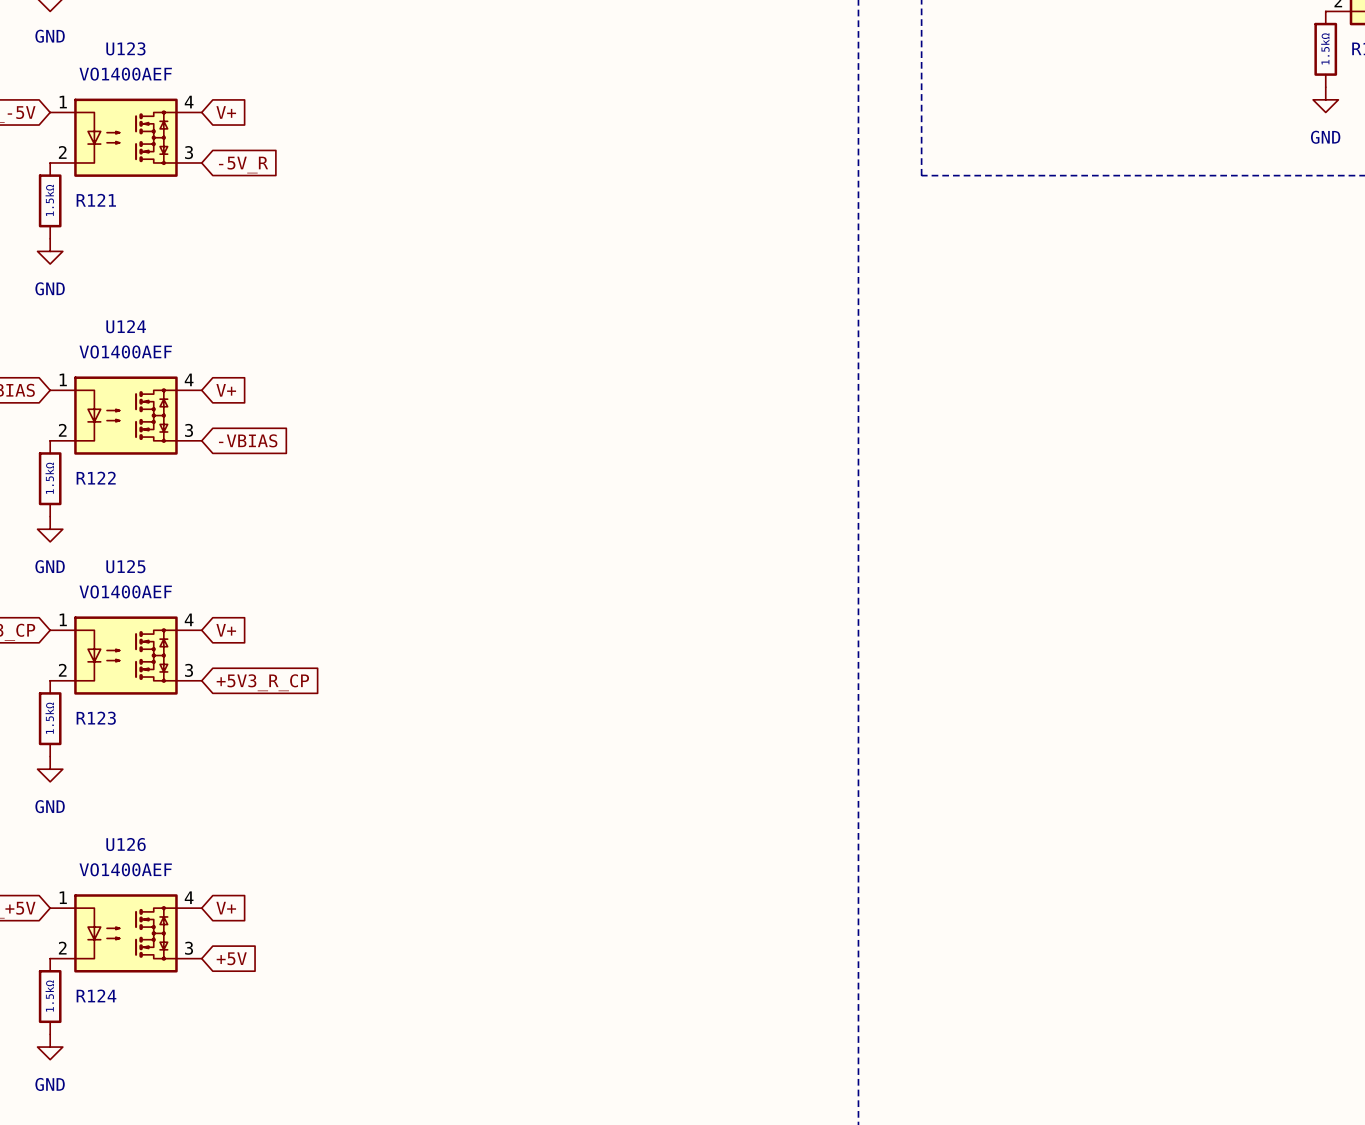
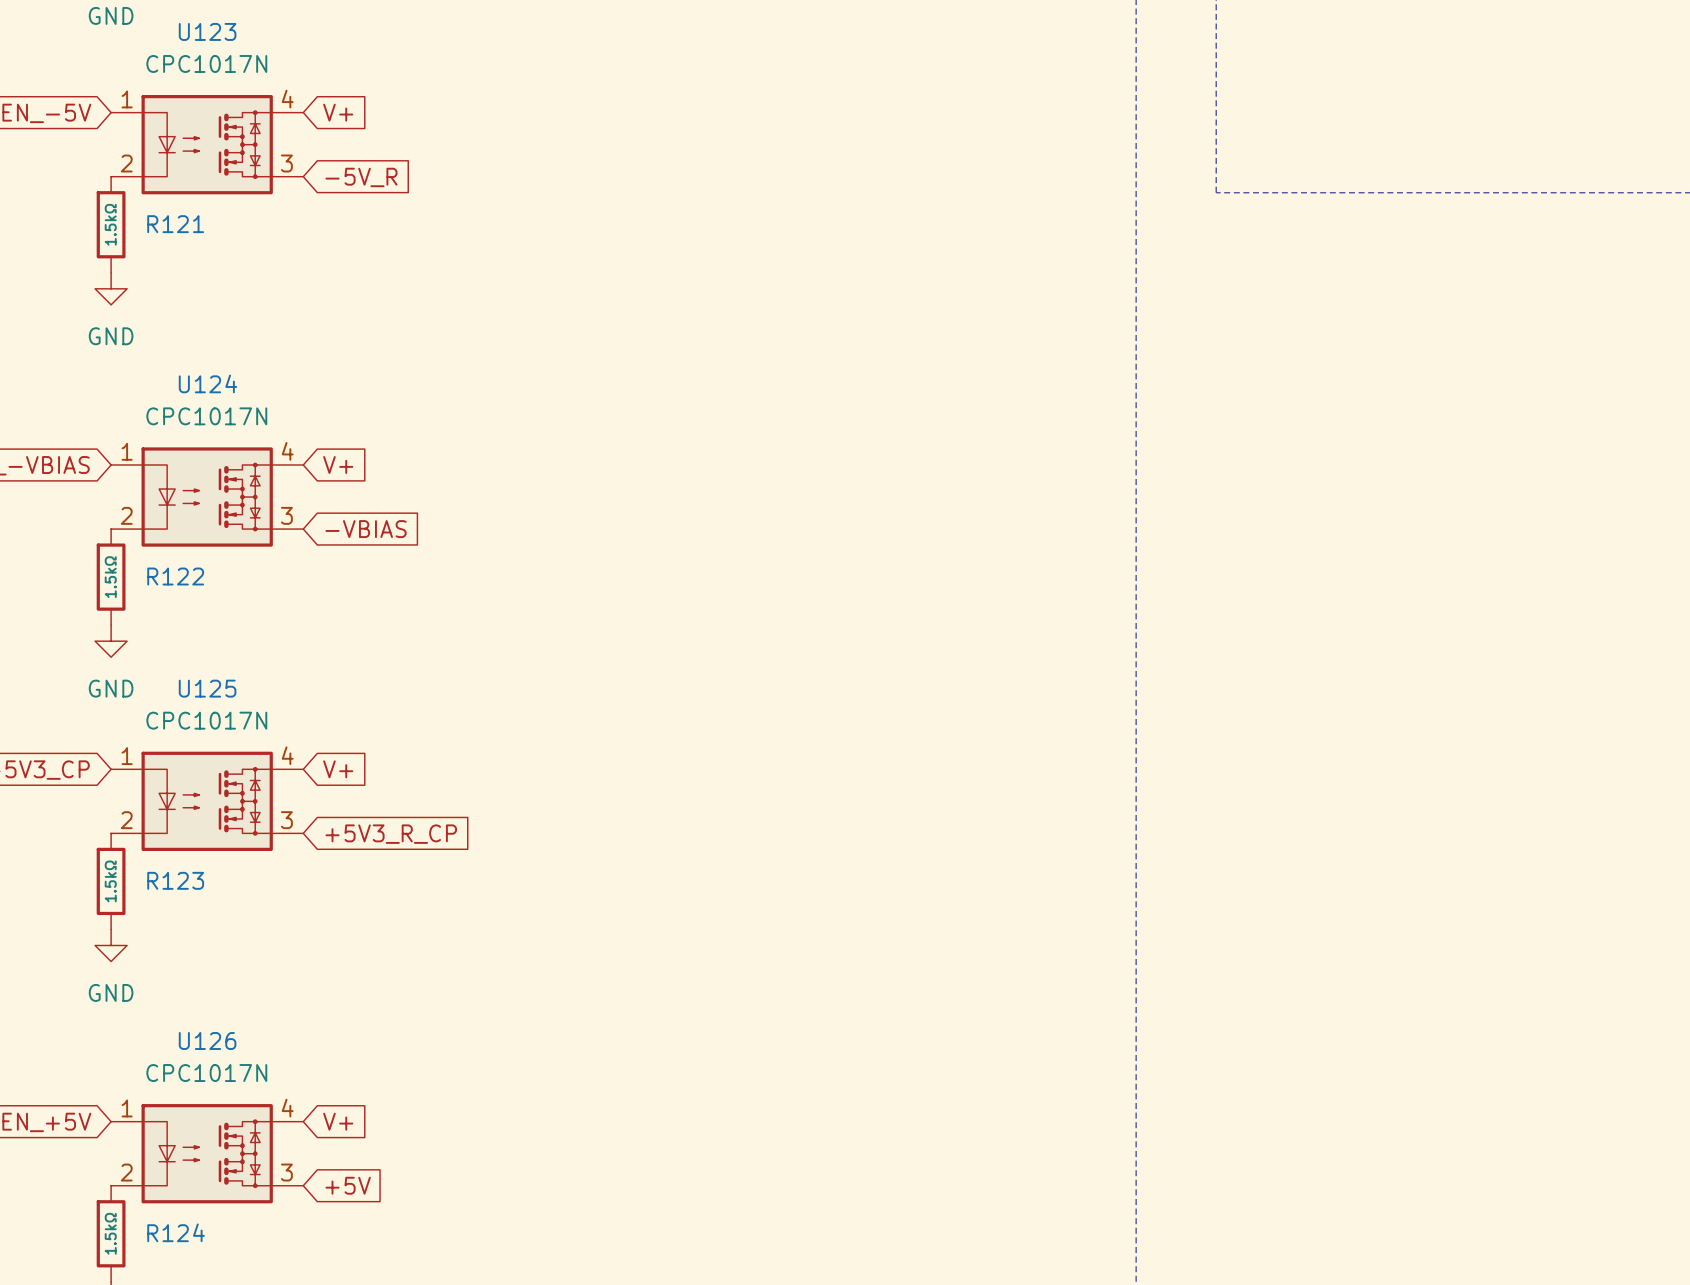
U123 value: VO1400AEF (125, 74) -> CPC1017N (206, 63)
U124 value: VO1400AEF (125, 351) -> CPC1017N (206, 416)
U125 value: VO1400AEF (125, 591) -> CPC1017N (206, 720)
U126 value: VO1400AEF (125, 869) -> CPC1017N (206, 1073)

